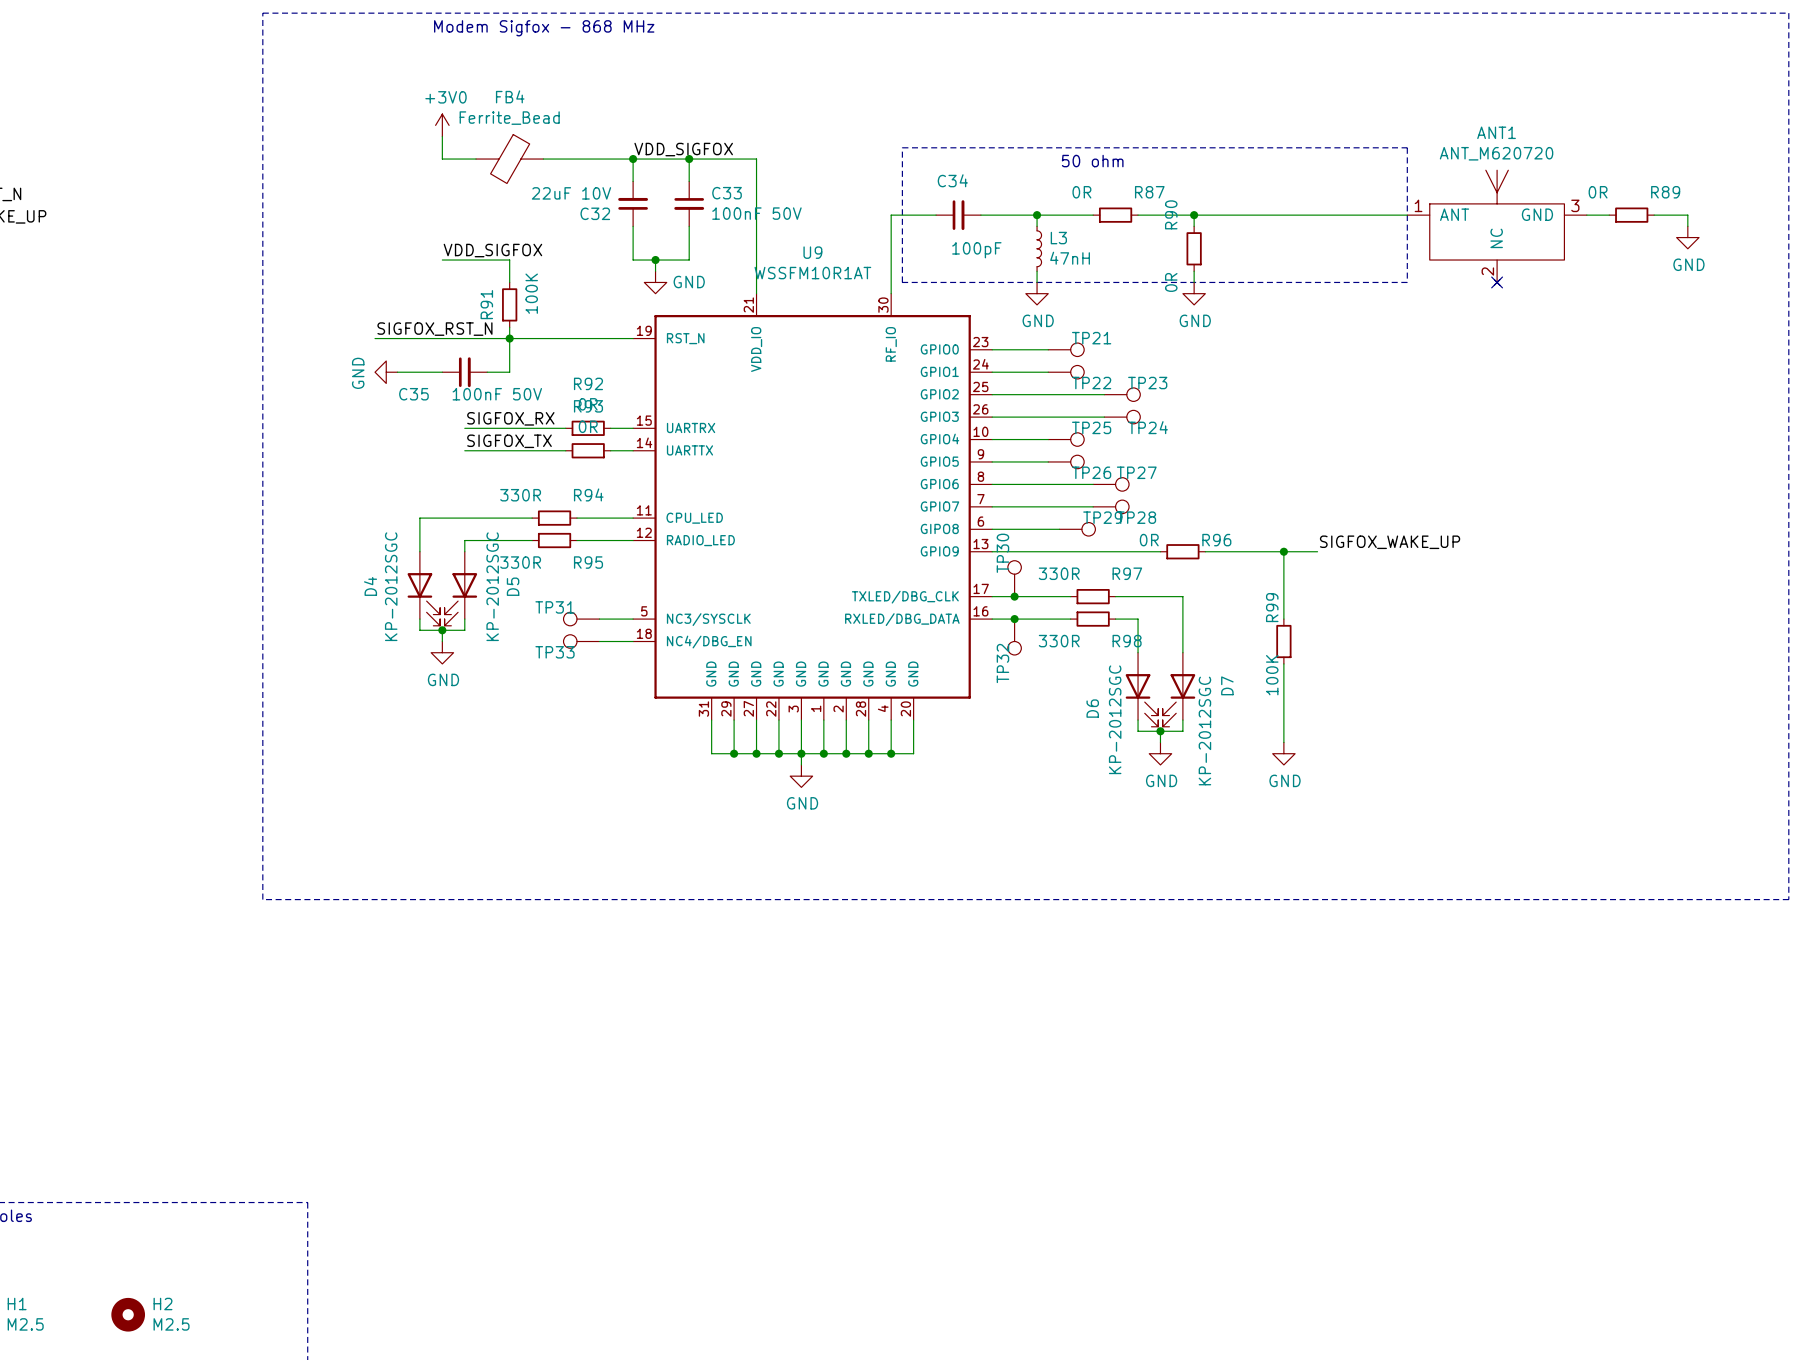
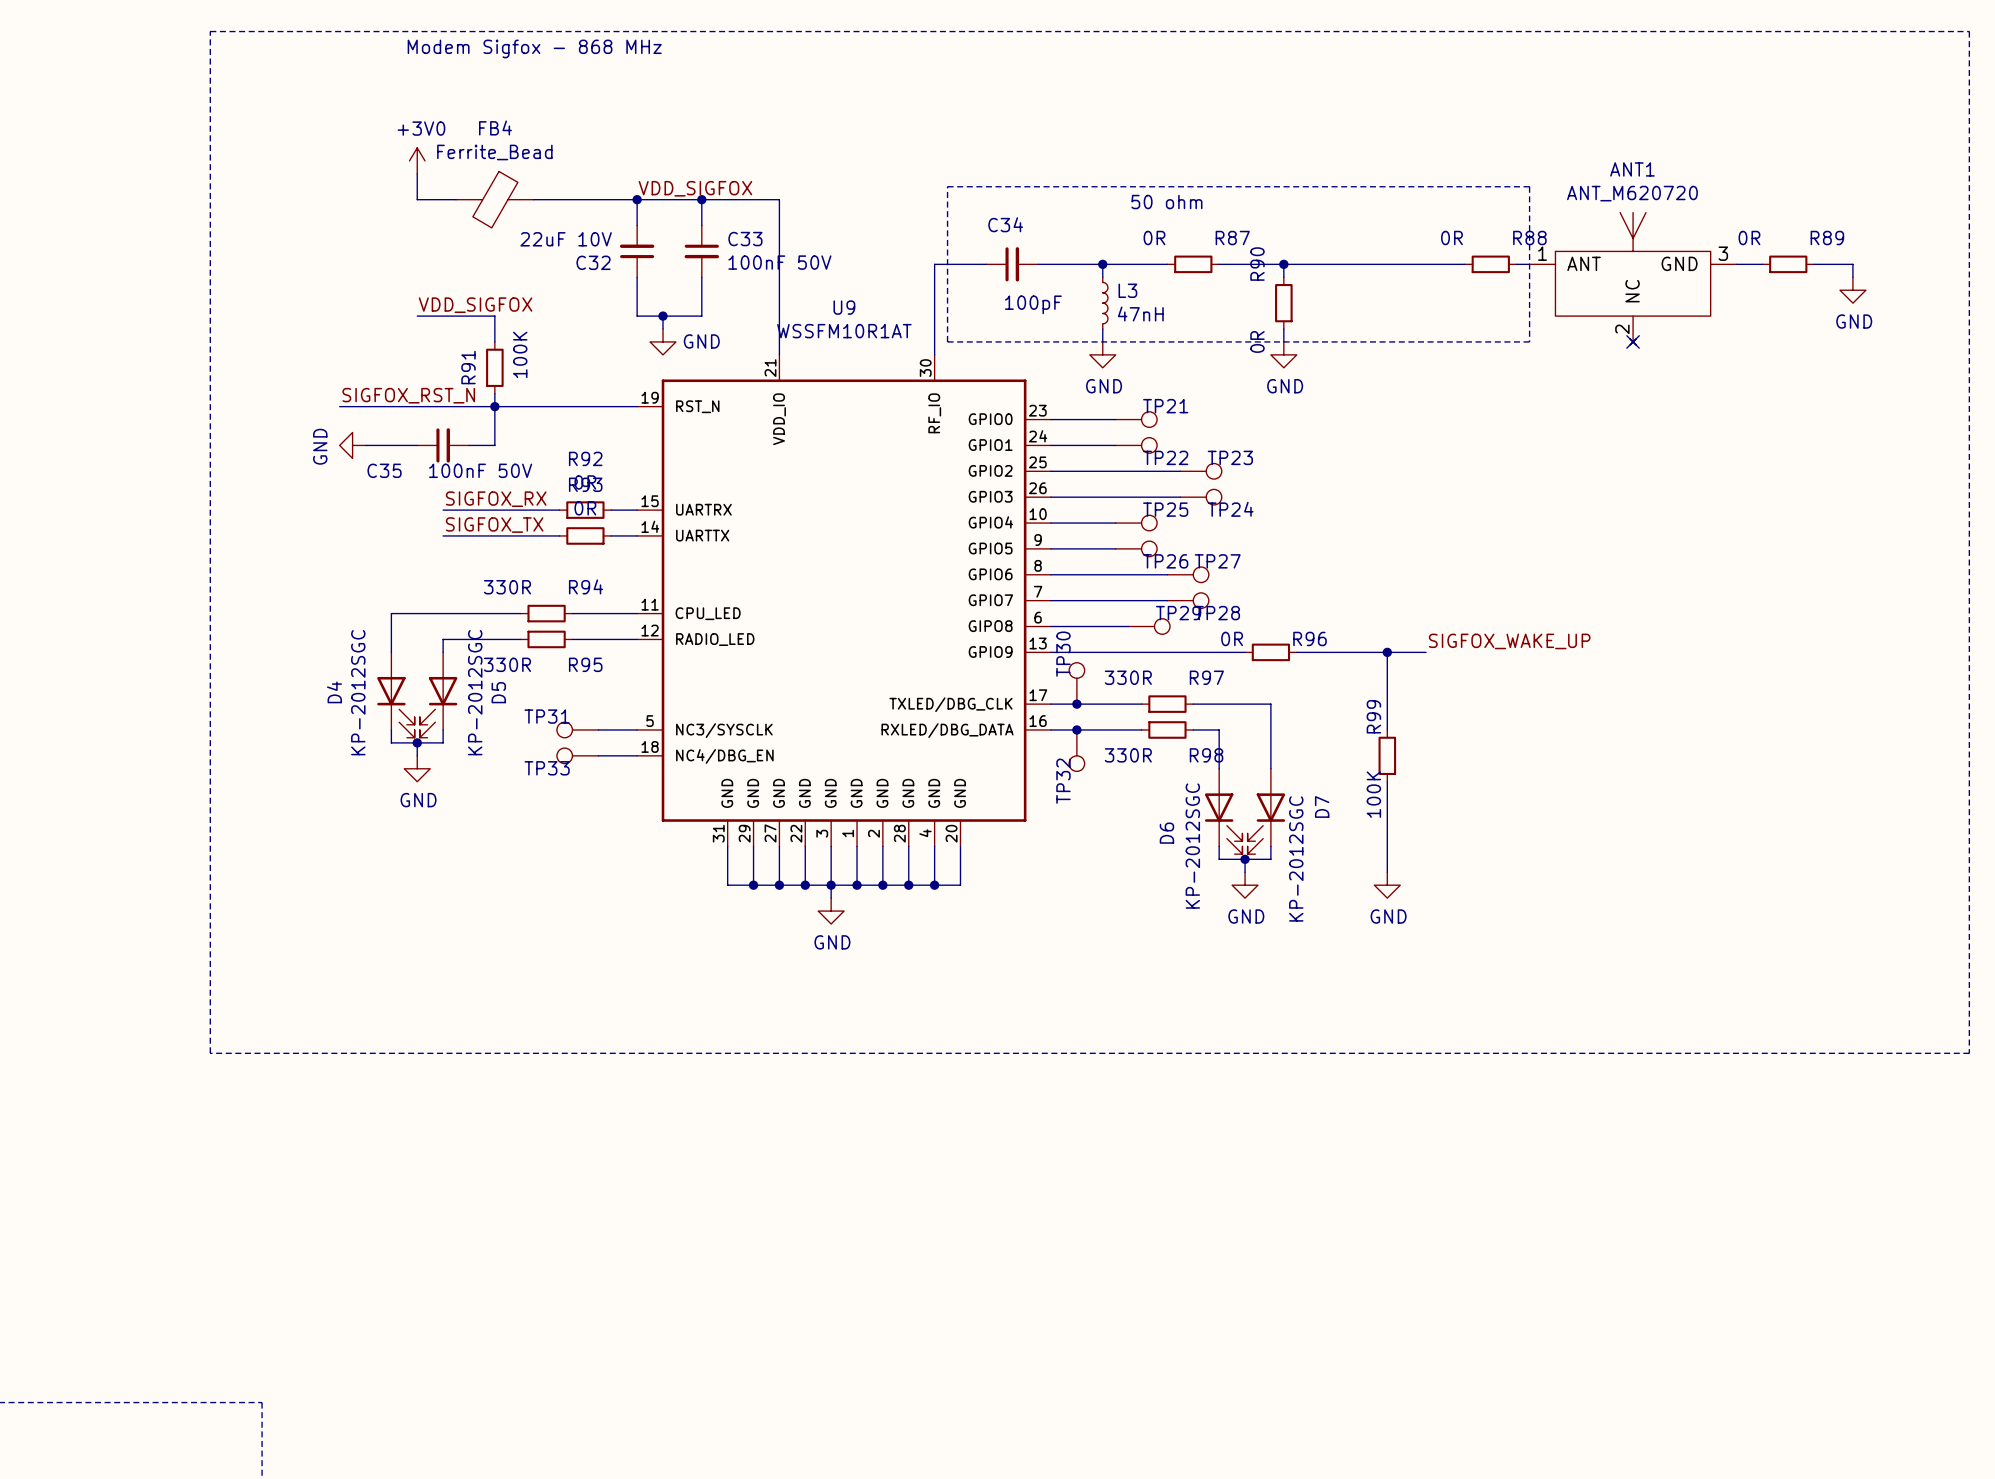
wire: (1351, 215) (1396, 215) -> none
R88: none -> 0R (1490, 264)

